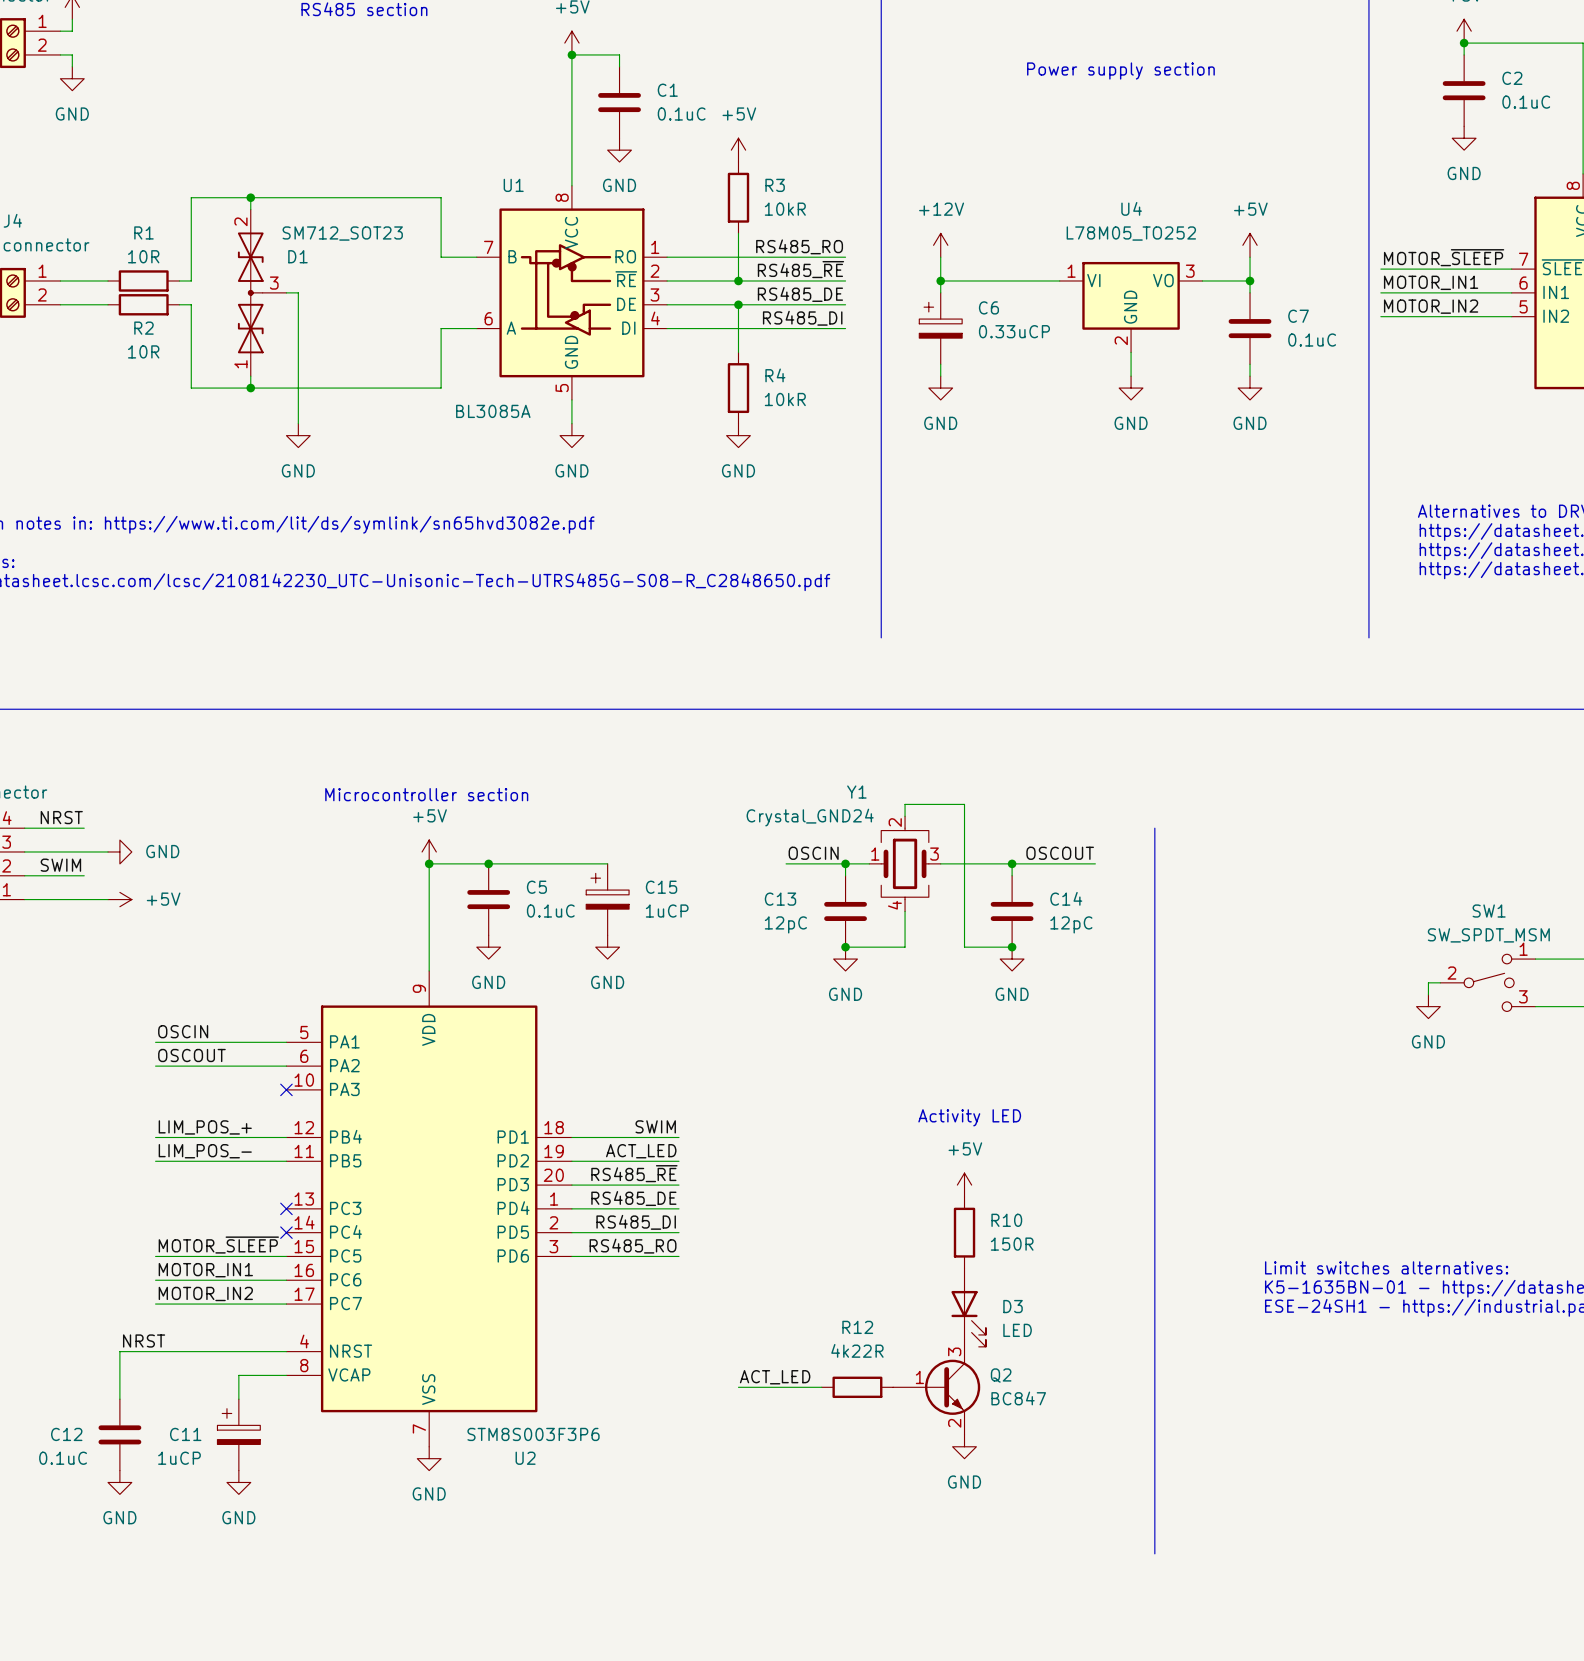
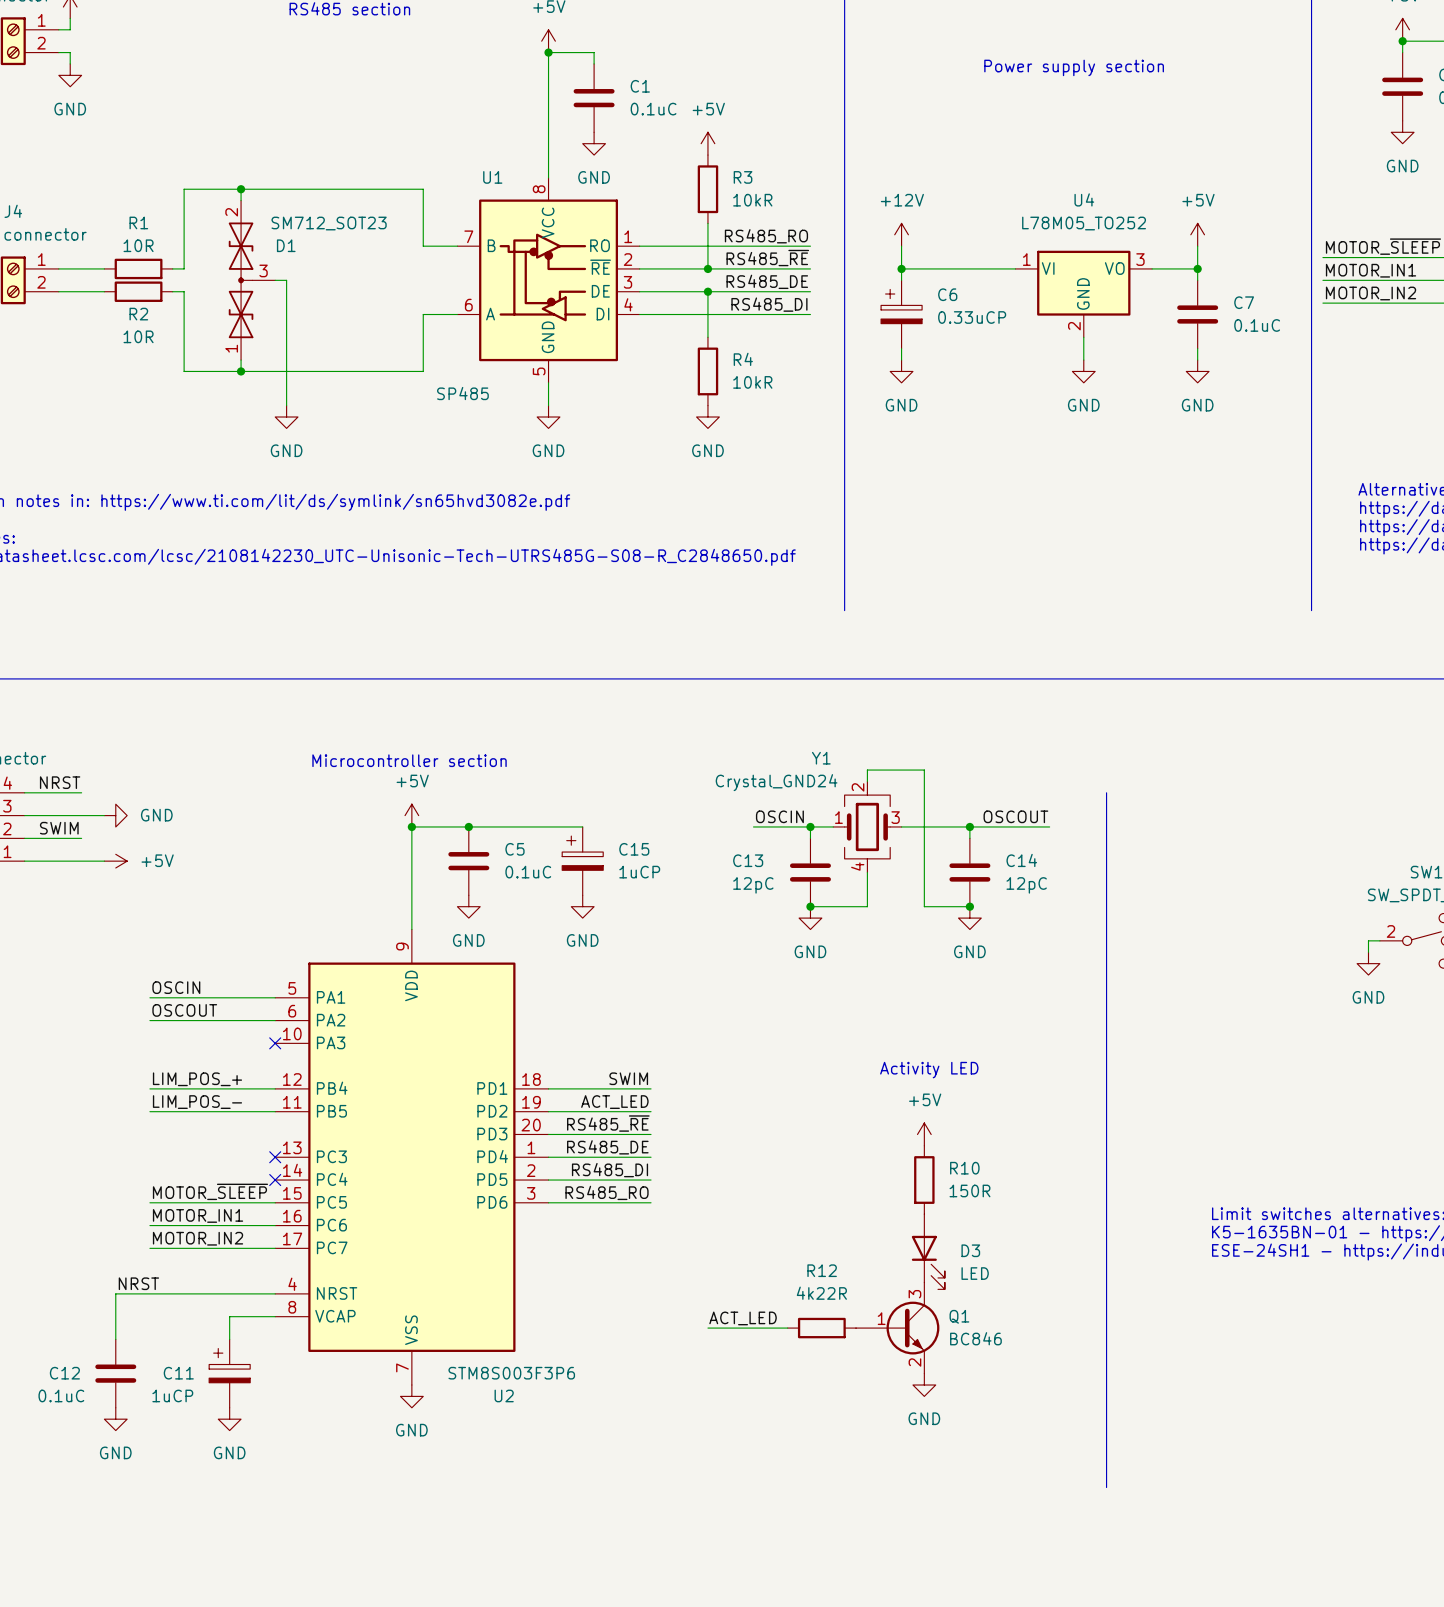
U1 value: BL3085A (493, 411) -> SP485 (462, 393)
Q2 name: Q2 (1001, 1375) -> Q1 (959, 1316)
Q2 value: BC847 (1018, 1398) -> BC846 (975, 1338)

